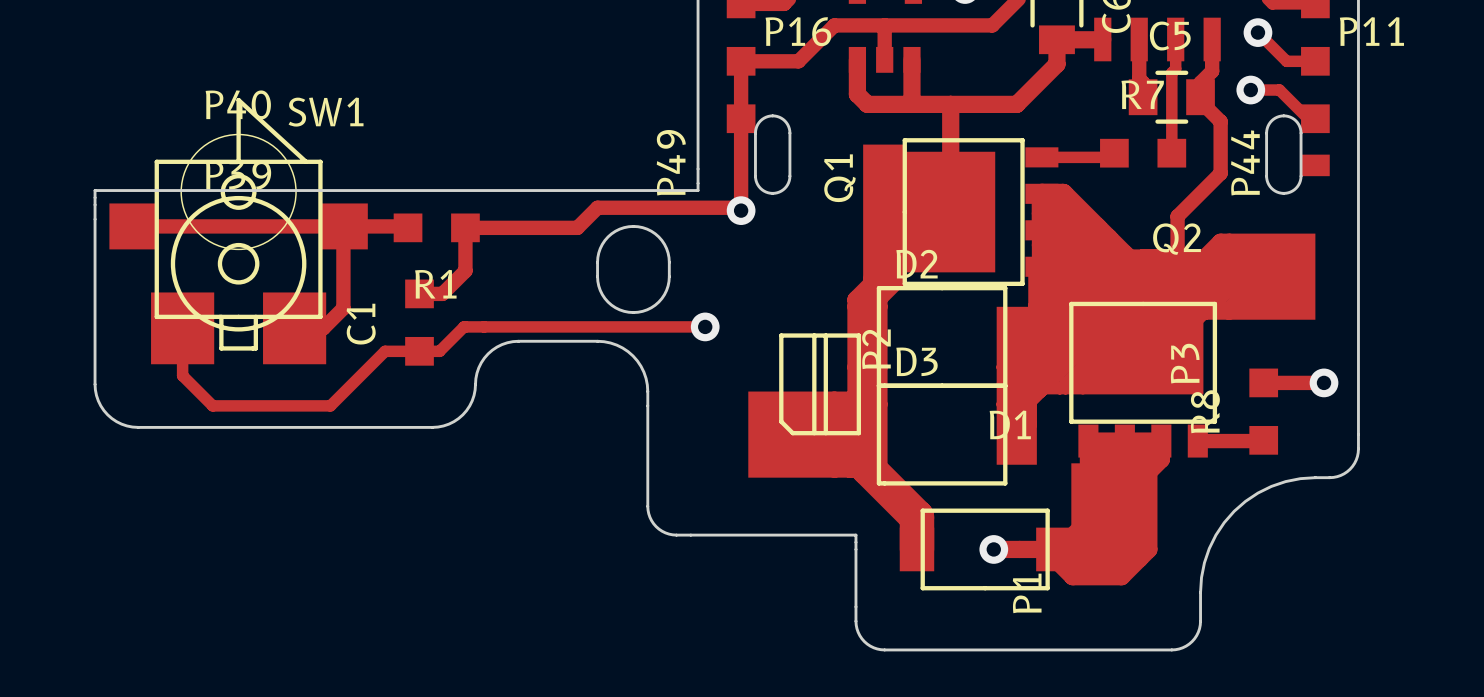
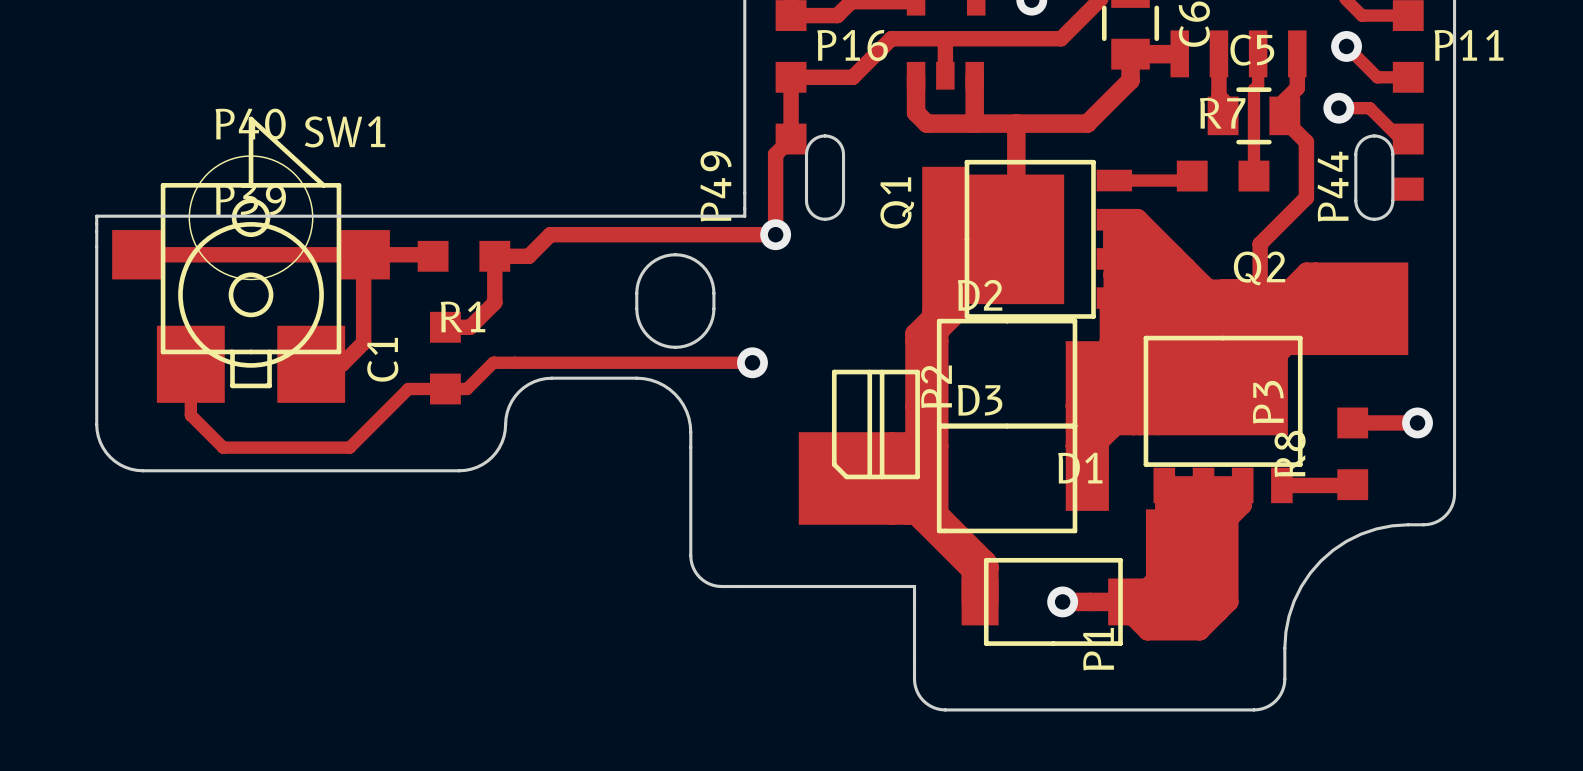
track: (741, 118) (741, 212) (738, 207) (726, 207) -> (791, 139) (775, 154) (775, 234)
track: (597, 207) (577, 227) (497, 227) -> (636, 234) (550, 234) (528, 256)
via position: (741, 210) -> (775, 234)

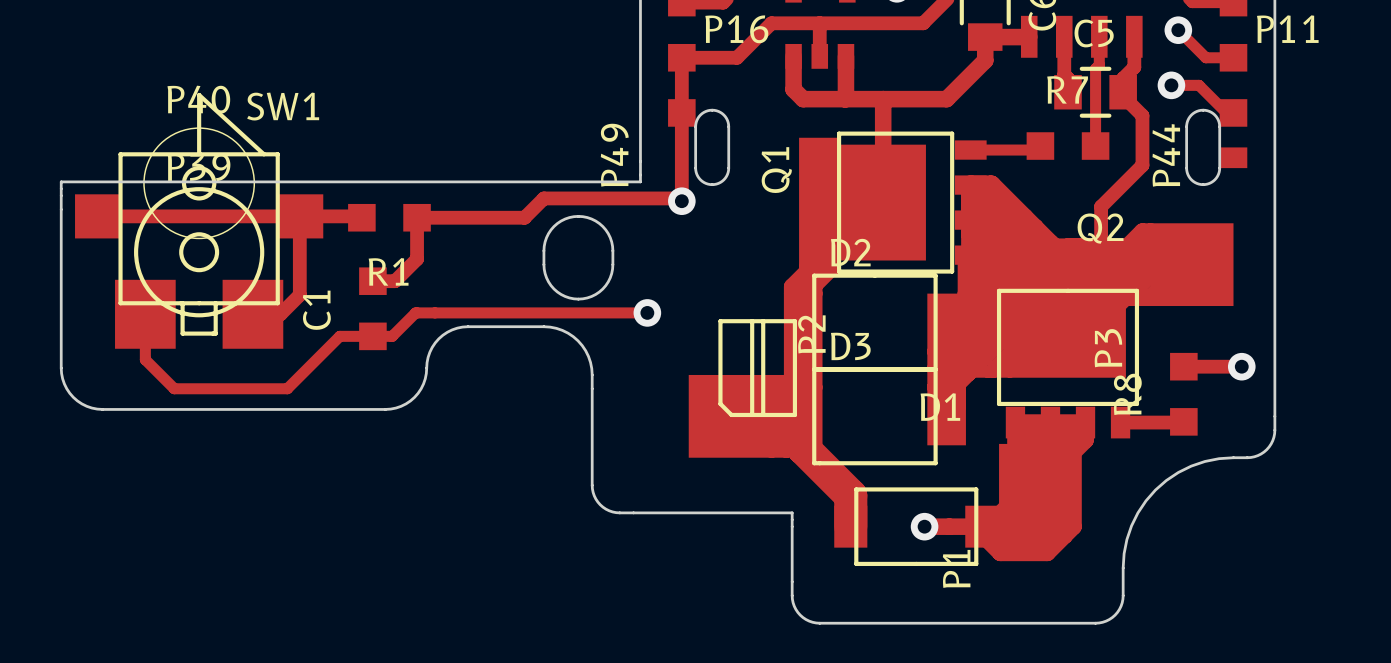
track: (791, 139) (775, 154) (775, 234) -> (681, 112) (681, 202) (679, 198) (668, 198)
track: (636, 234) (550, 234) (528, 256) -> (543, 198) (524, 217) (447, 217)
via position: (775, 234) -> (681, 201)

